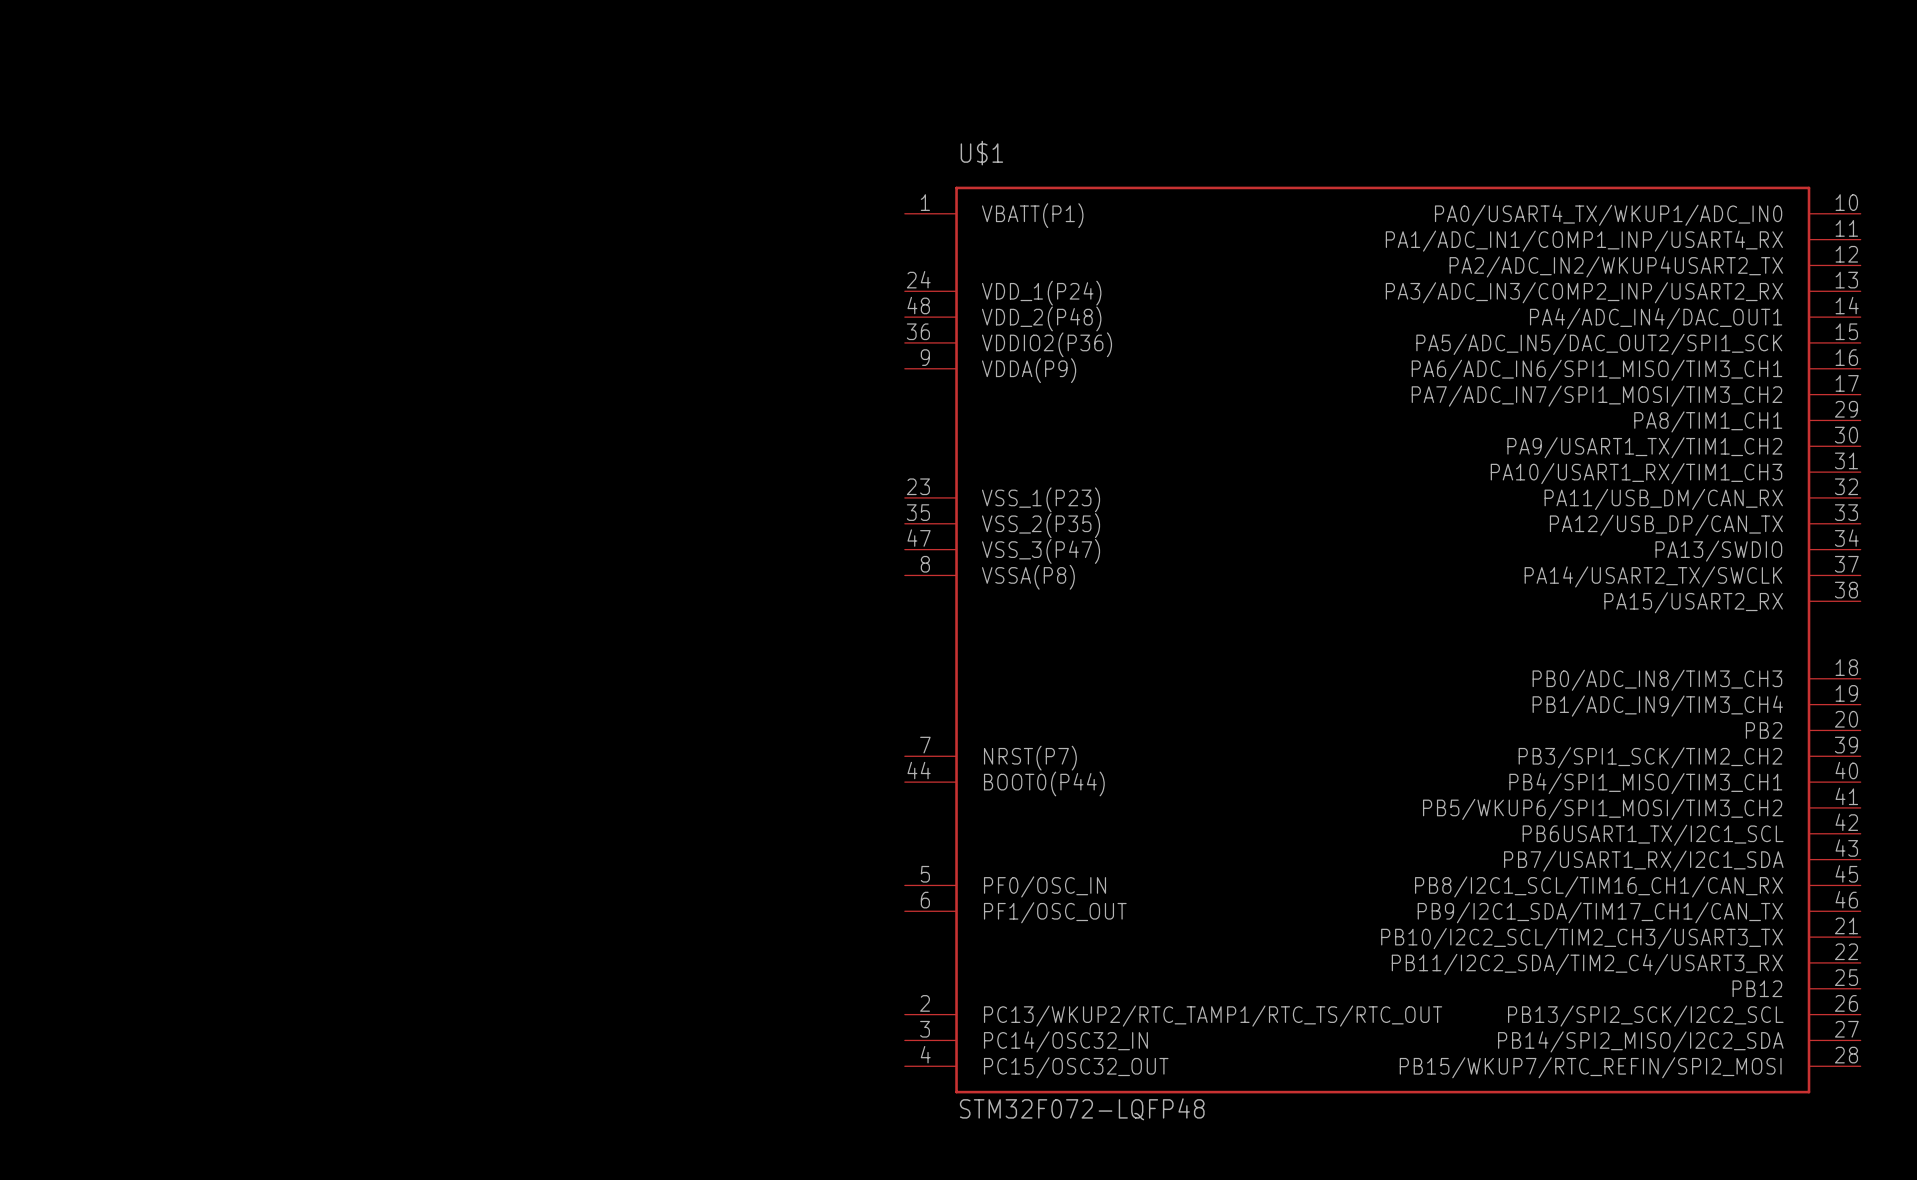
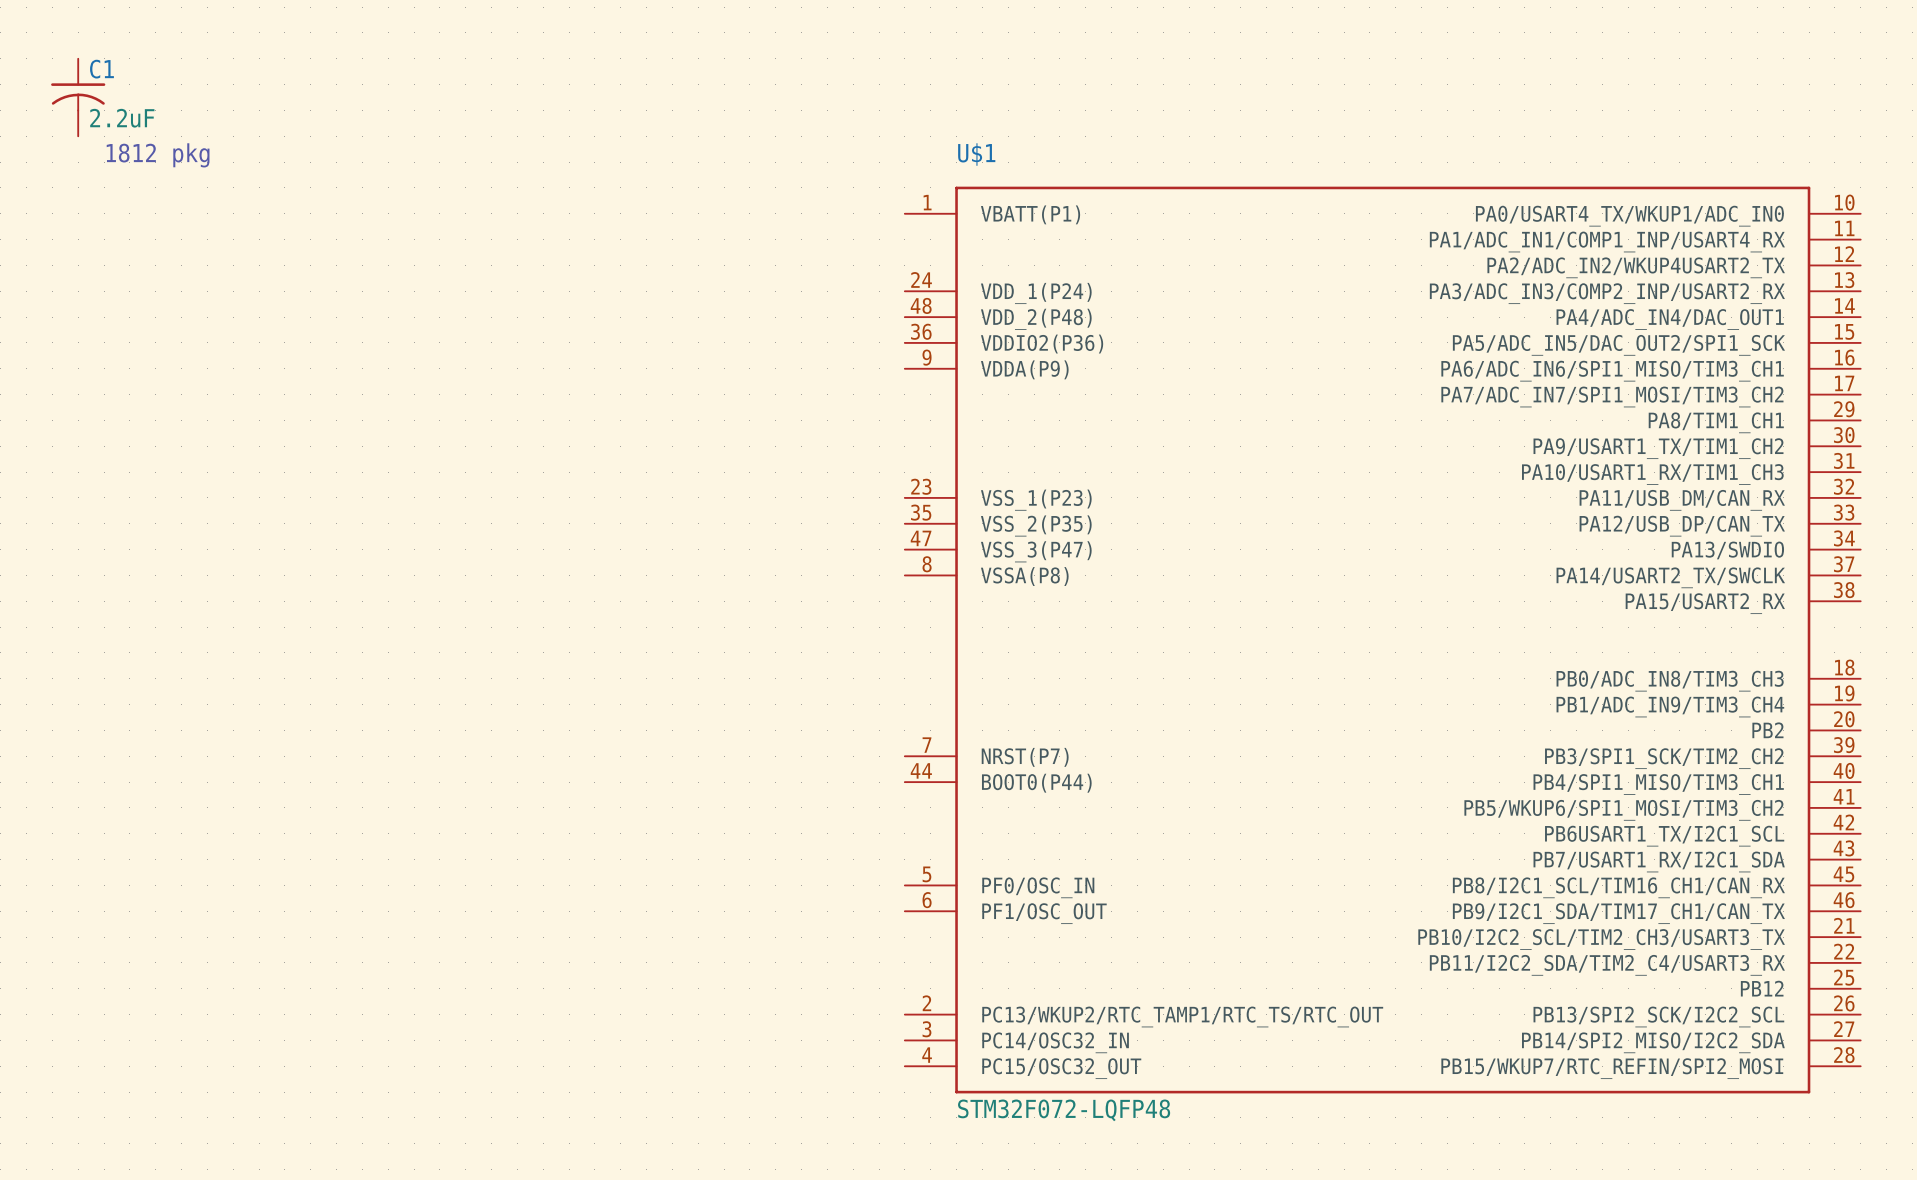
C1: none -> 2.2uF (78, 97)
text: none -> 1812 pkg (158, 155)

